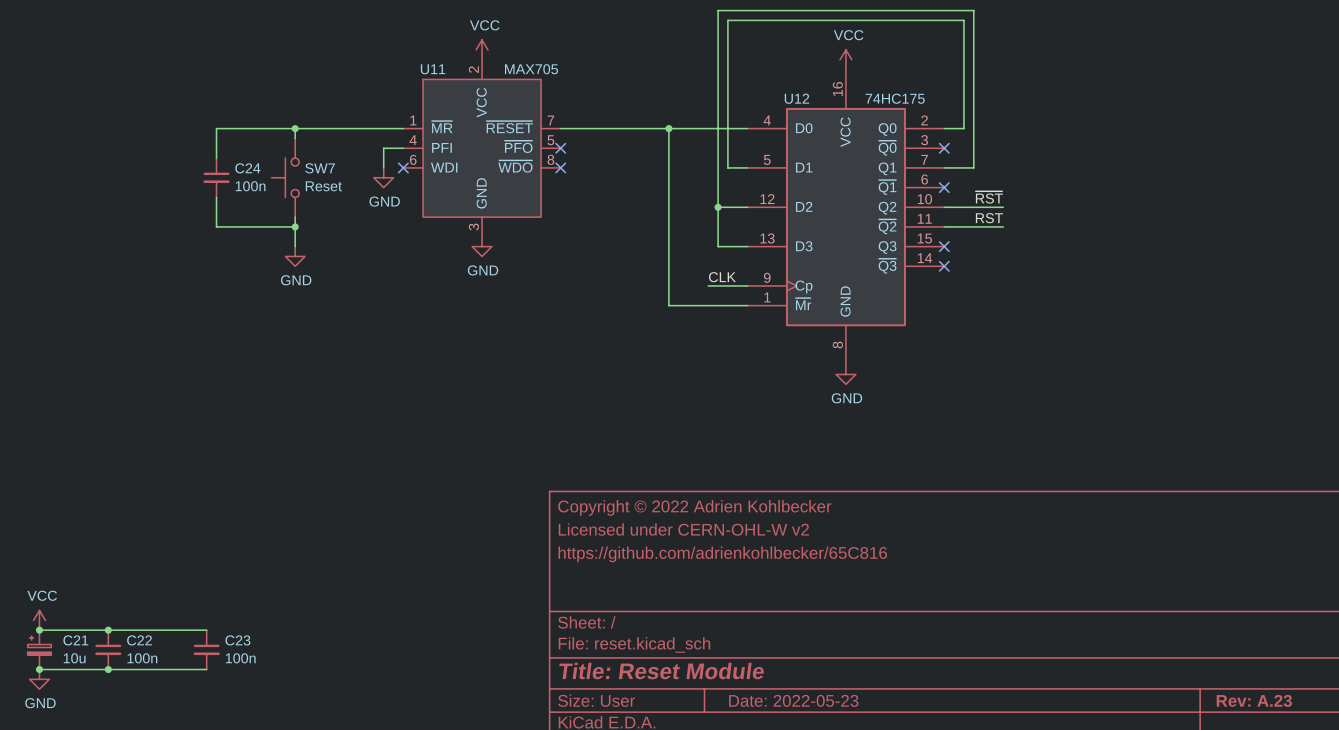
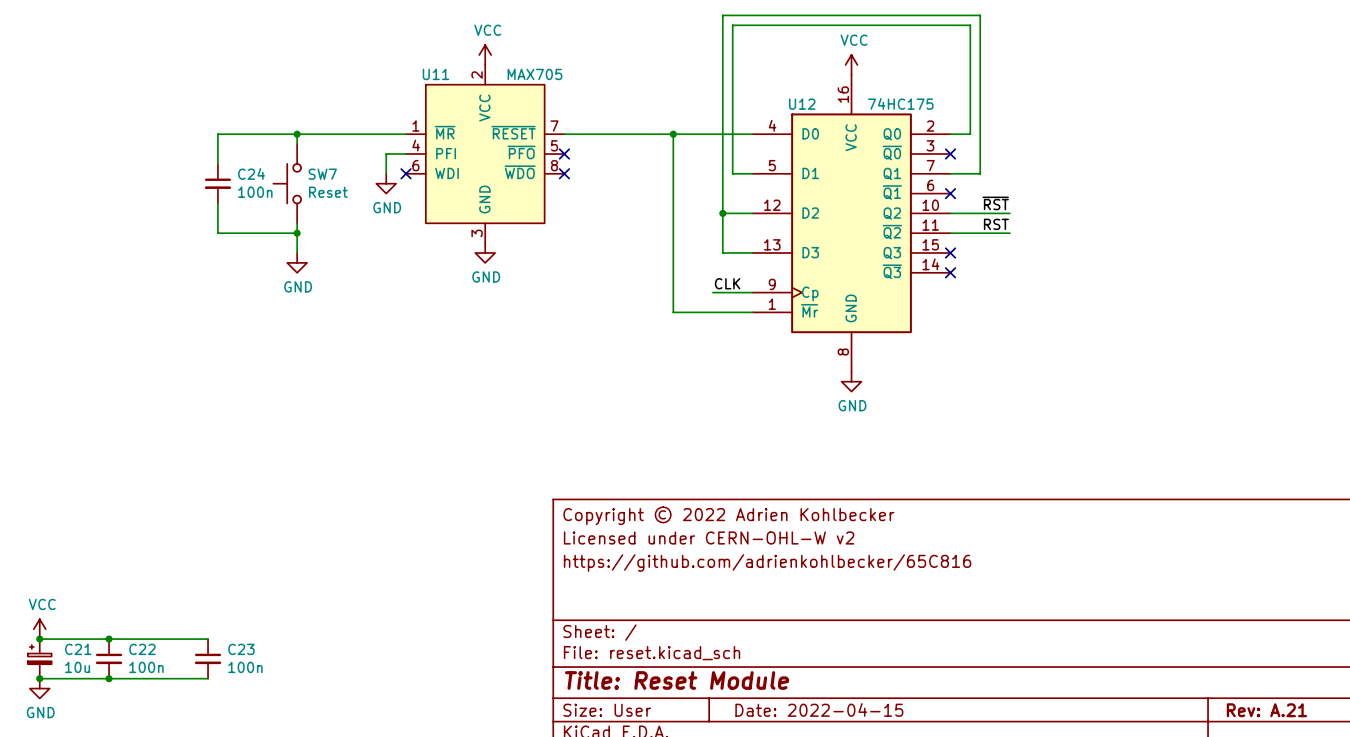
title block: Date: 2022-05-23 (793, 700) -> Date: 2022-04-15 (819, 709)
title block: Rev: A.23 (1254, 700) -> Rev: A.21 (1266, 710)

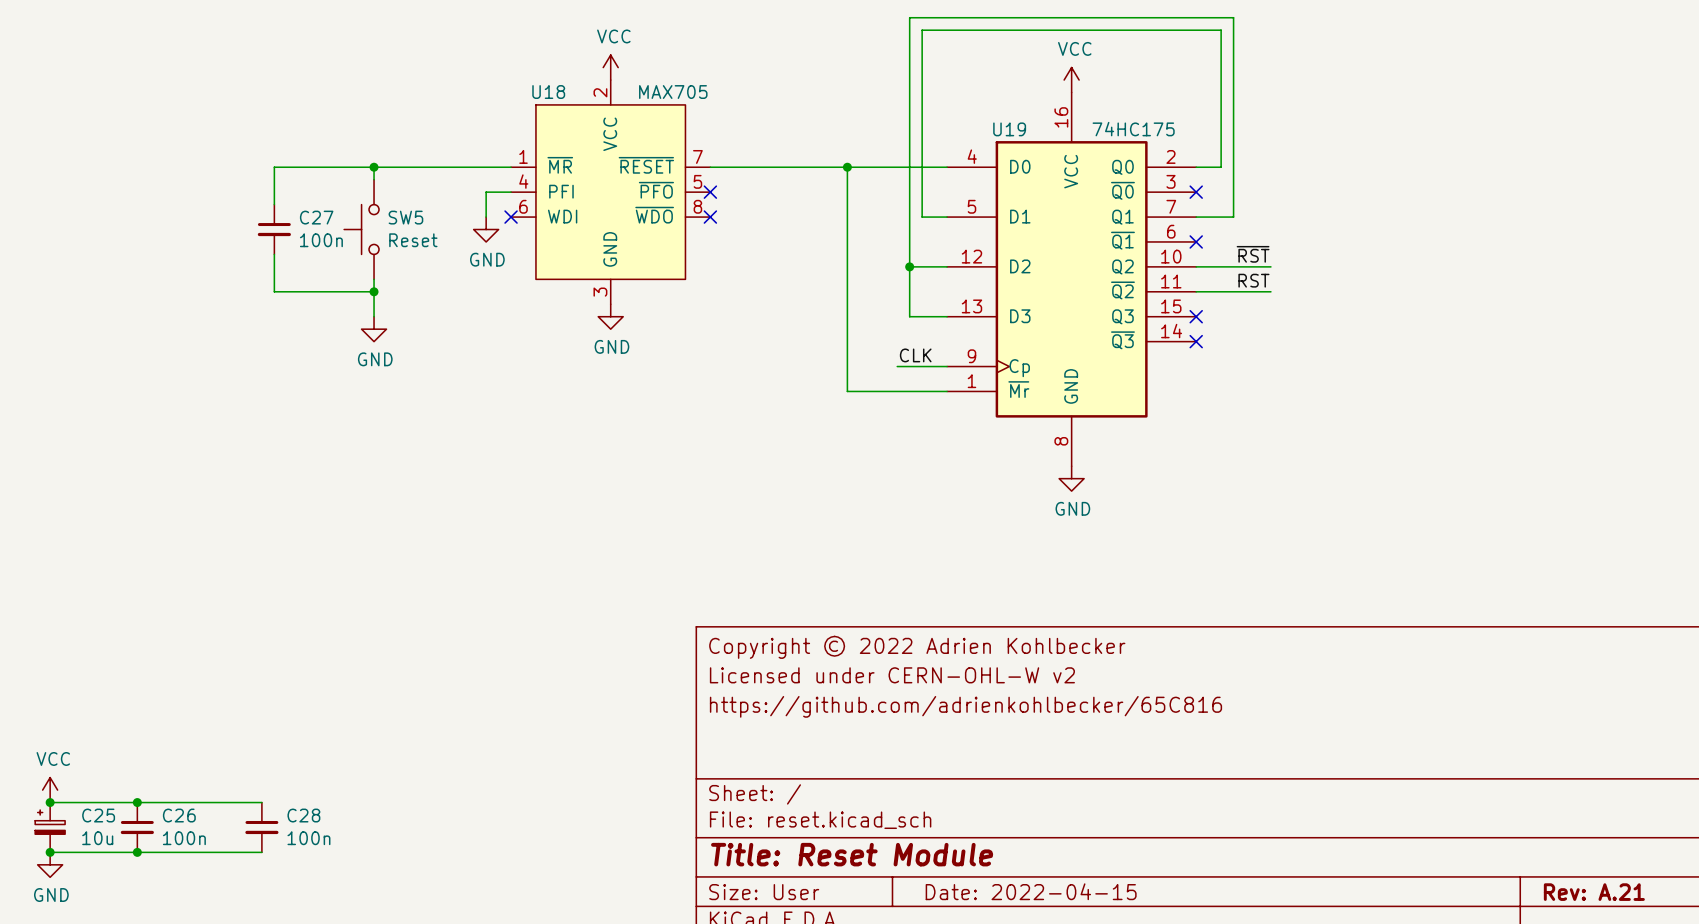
U11 name: U11 (435, 74) -> U18 (548, 92)
U12 name: U12 (802, 104) -> U19 (1009, 129)
C24 name: C24 (251, 173) -> C27 (316, 217)
SW7 name: SW7 (322, 174) -> SW5 (405, 217)
C21 name: C21 (78, 649) -> C25 (98, 815)
C22 name: C22 (142, 649) -> C26 (179, 815)
C23 name: C23 (241, 649) -> C28 (303, 815)

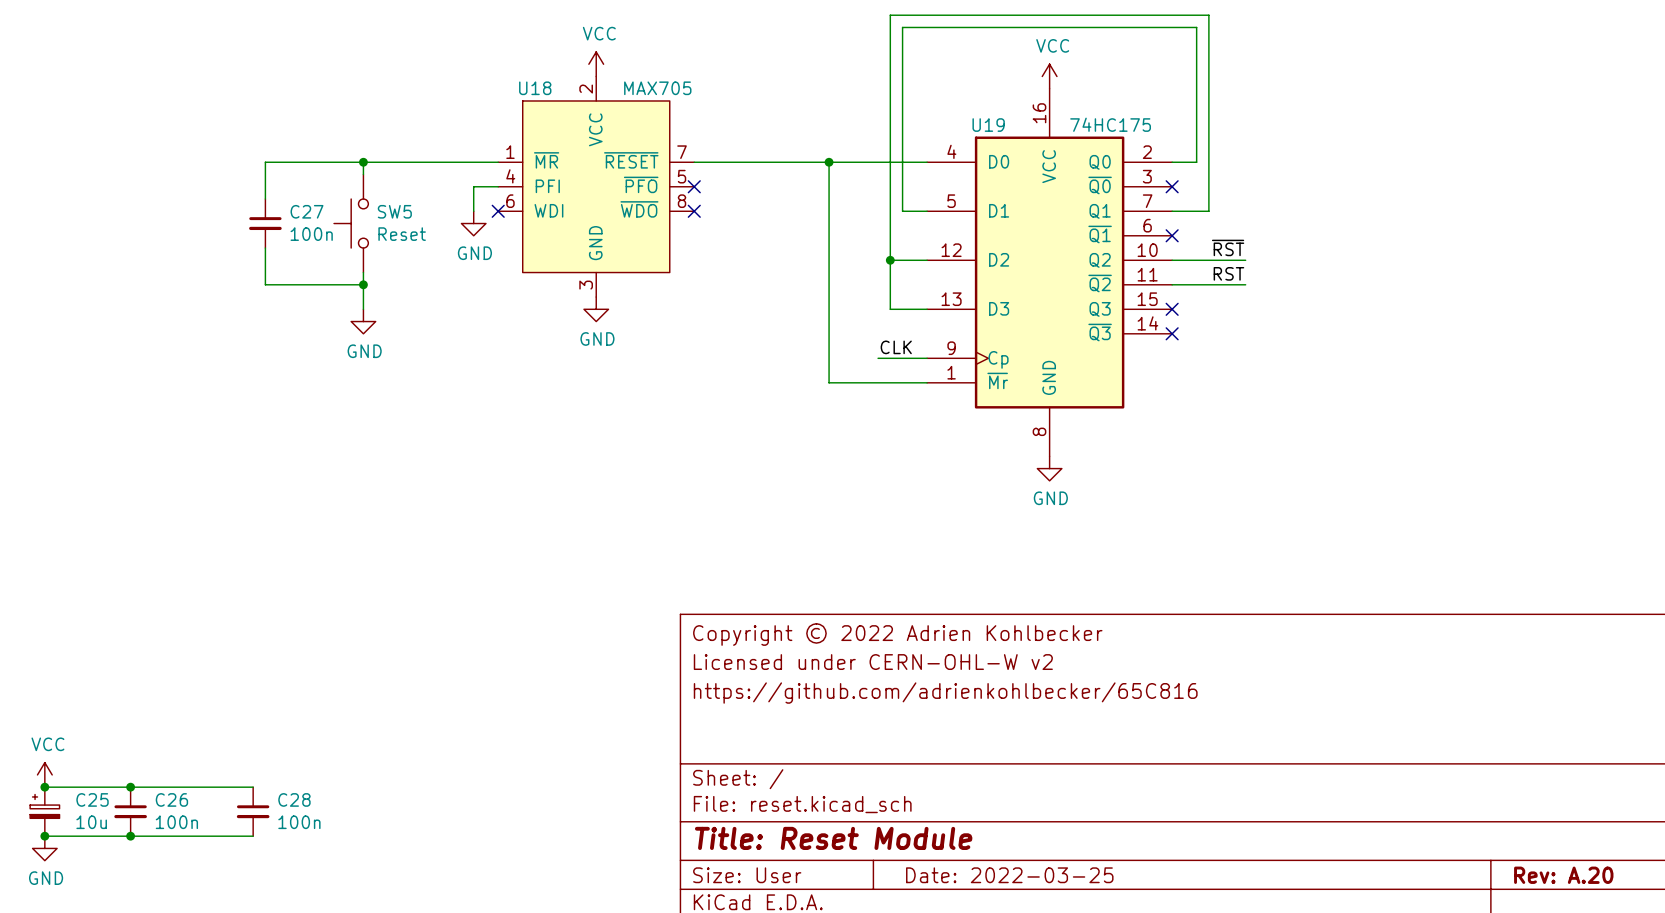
title block: Date: 2022-04-15 (1031, 891) -> Date: 2022-03-25 (1009, 875)
title block: Rev: A.21 (1594, 892) -> Rev: A.20 (1563, 875)

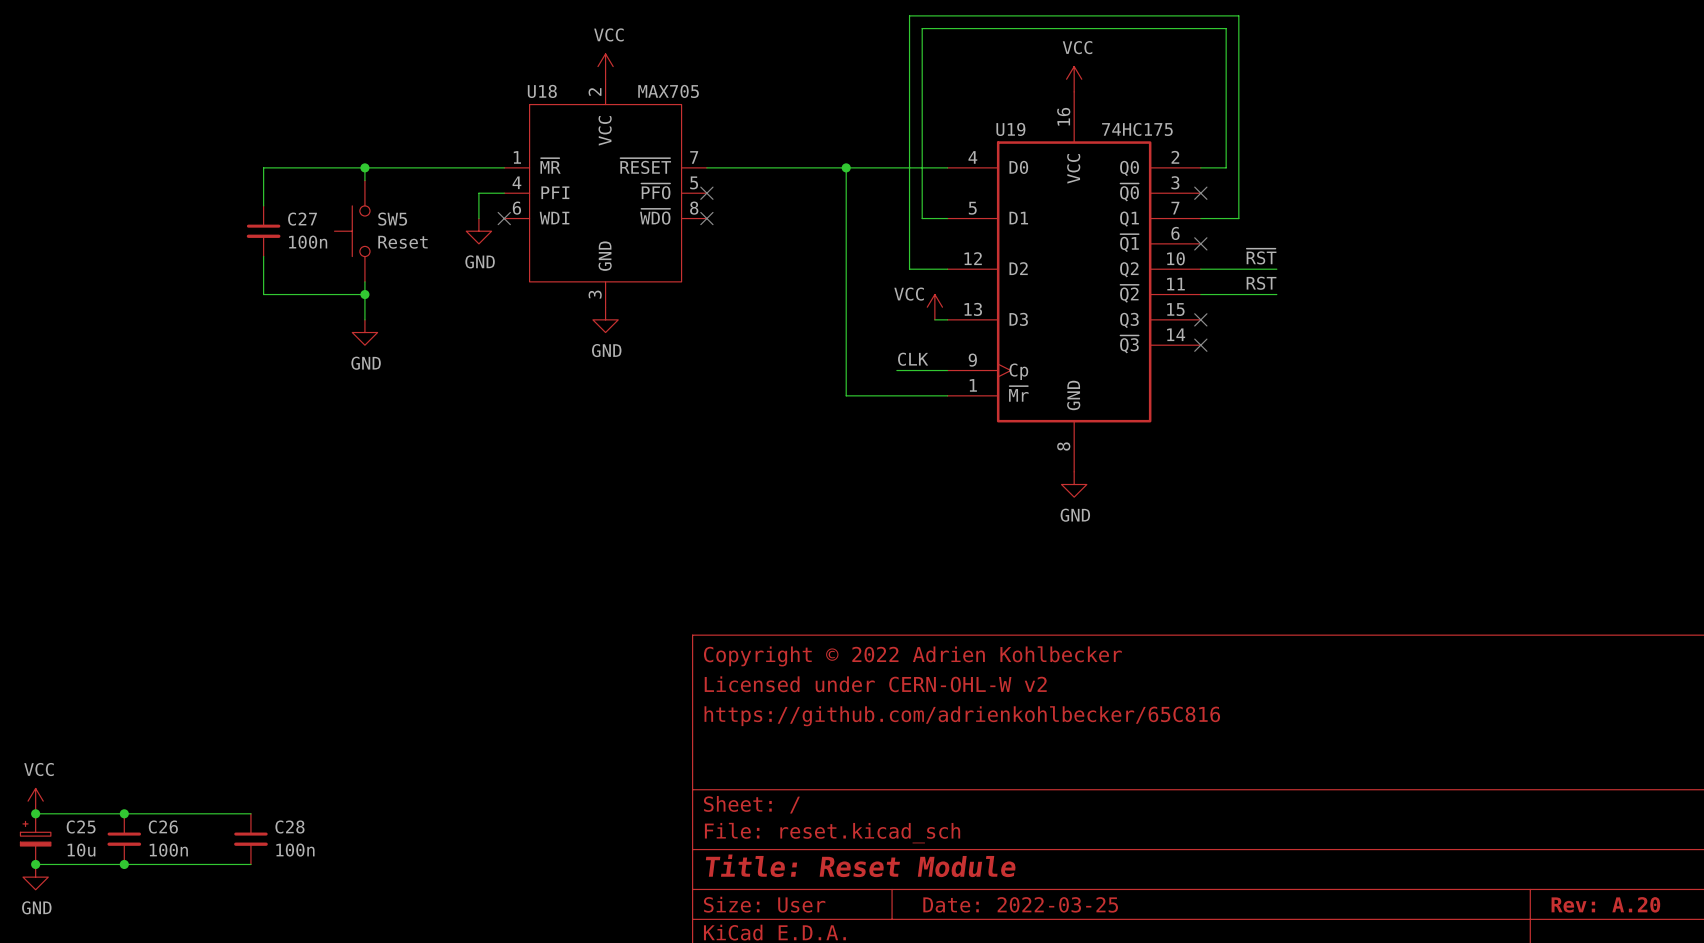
wire: (890, 260) (890, 309) (914, 309) -> none
junction: (890, 260) -> none
power symbol: none -> VCC (934, 307)

